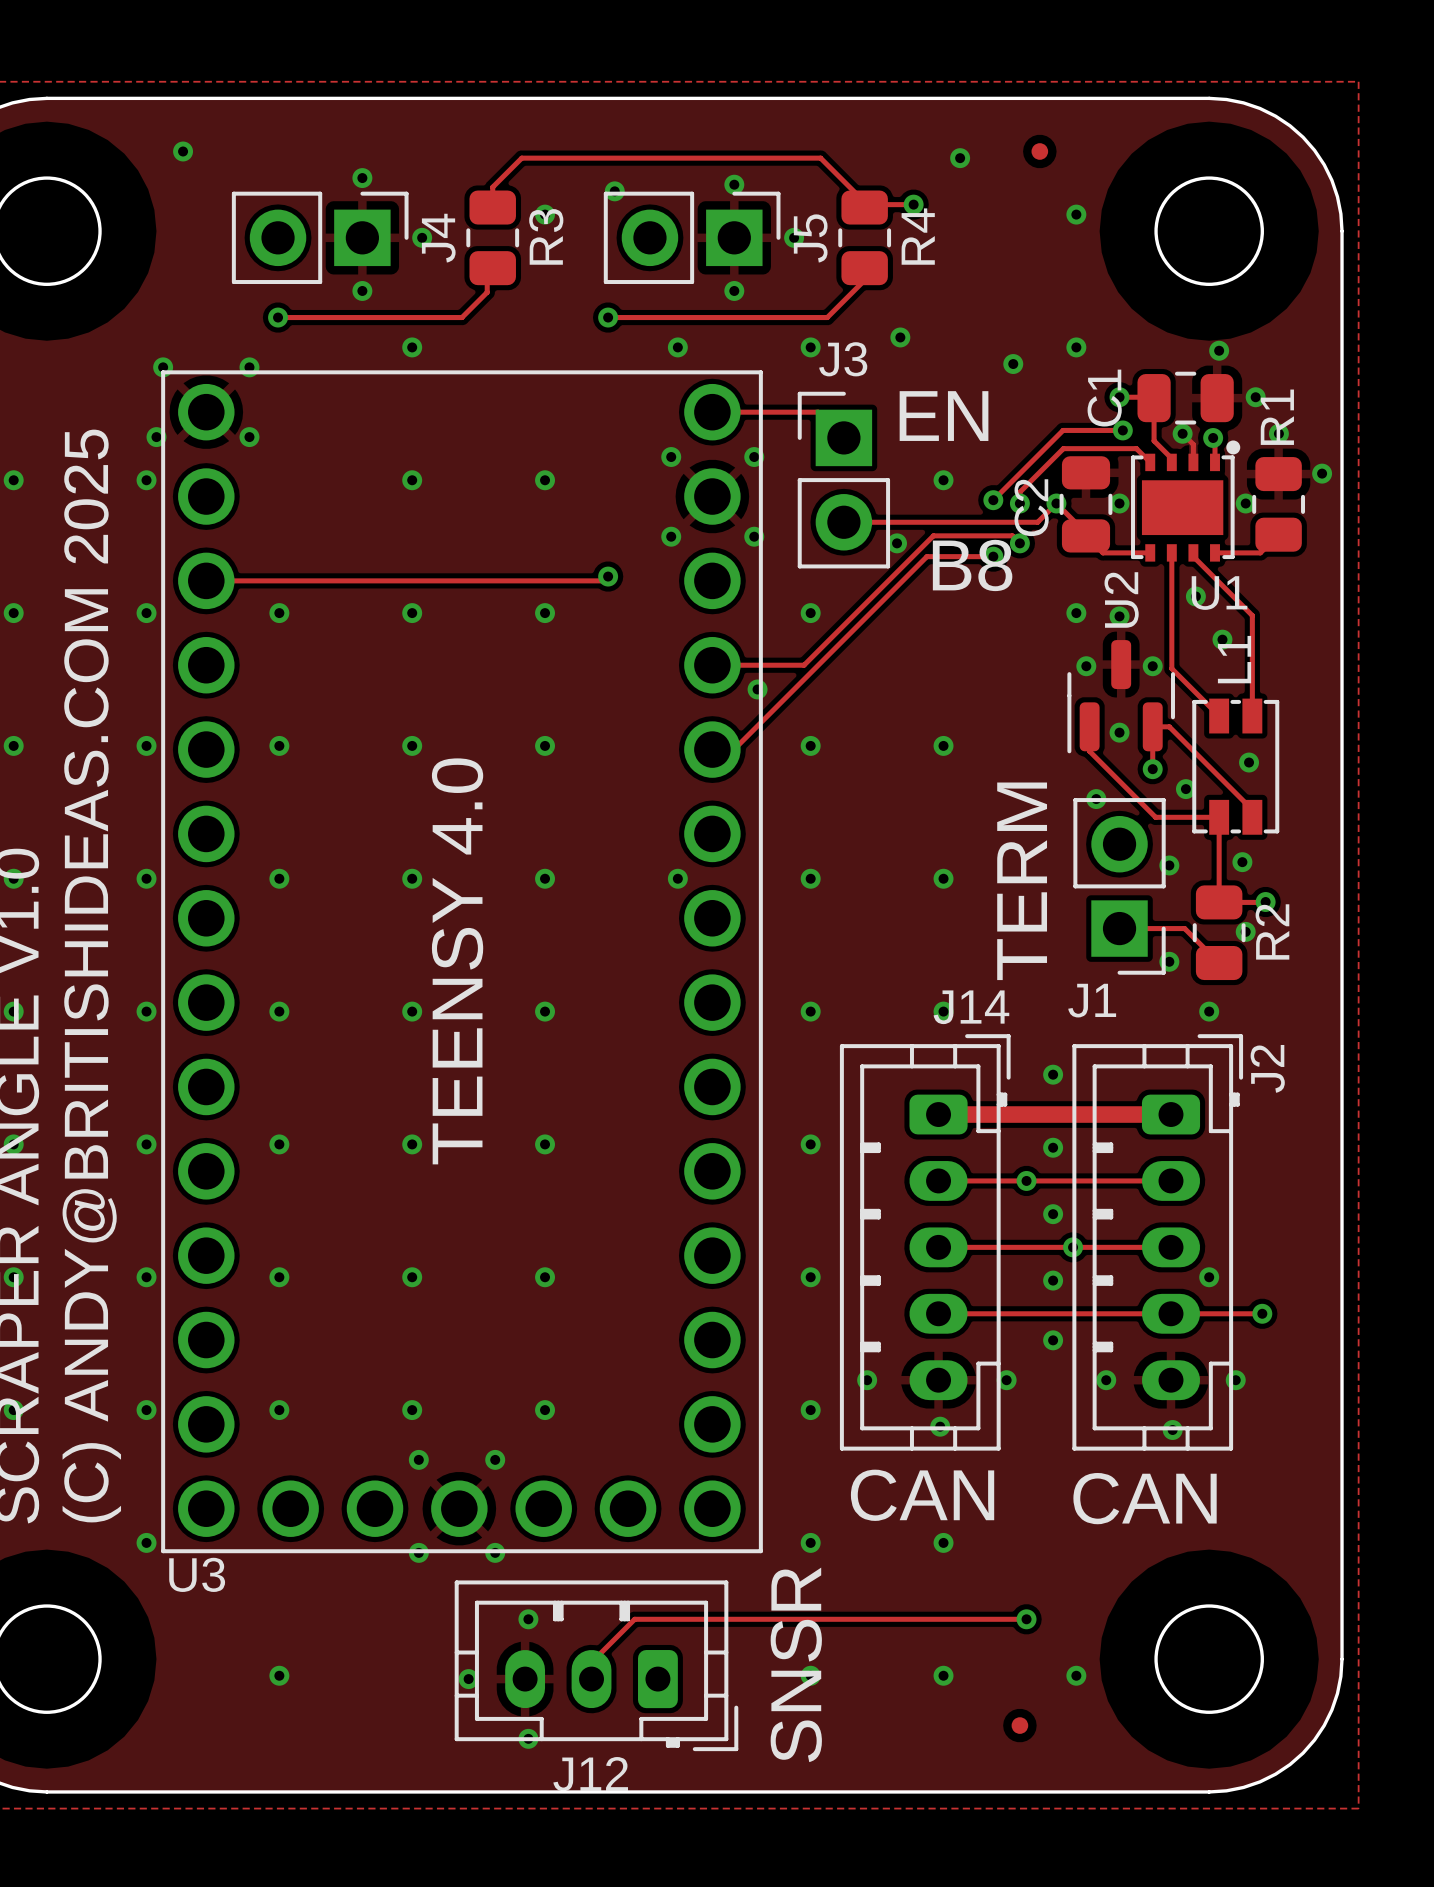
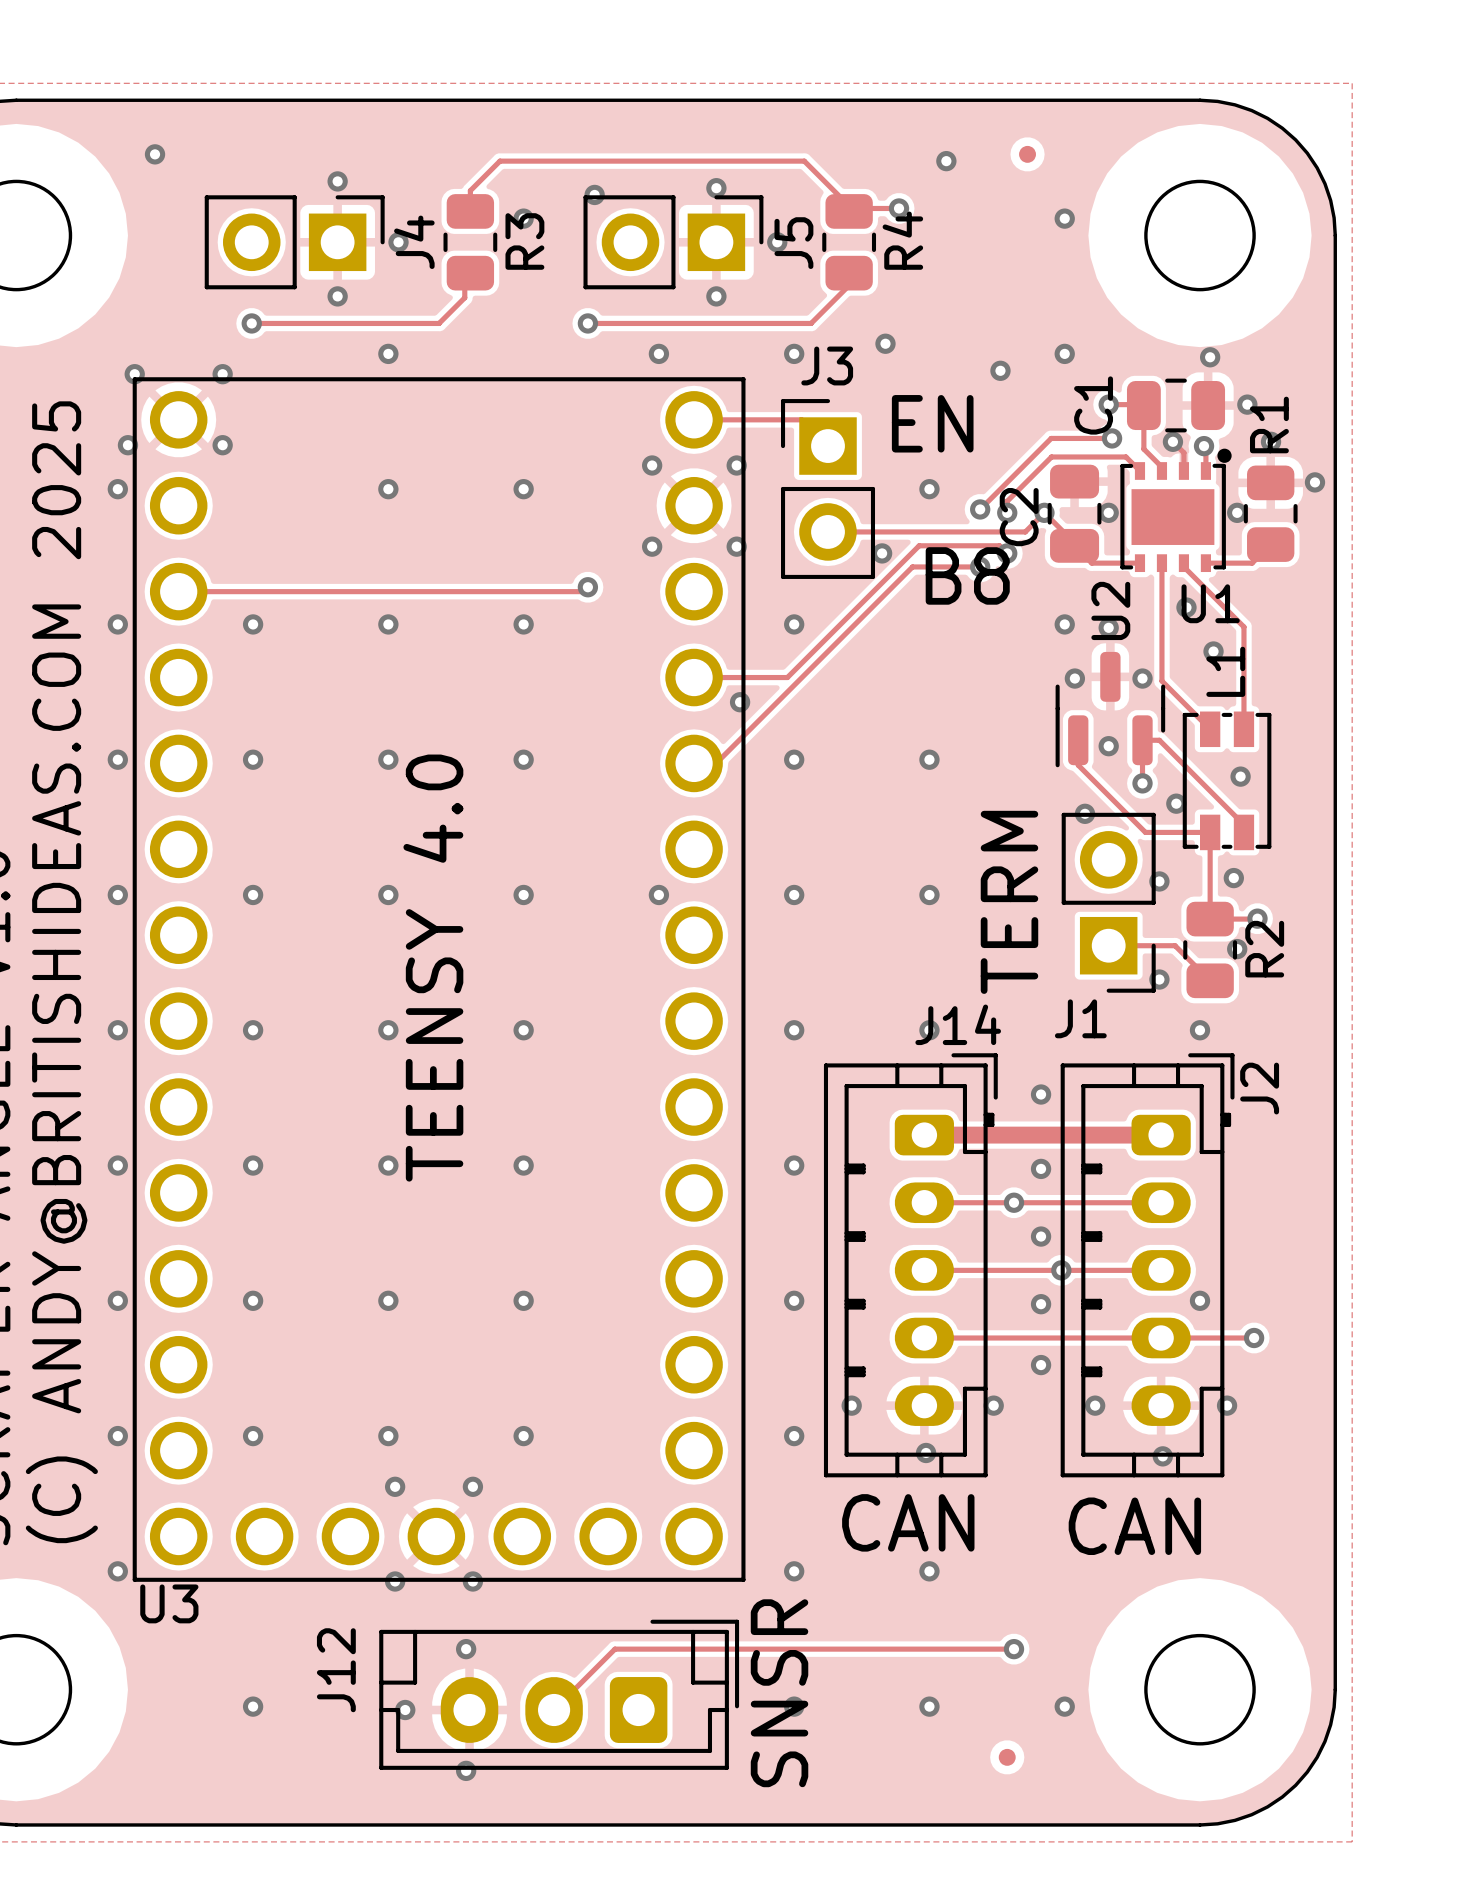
J12 footprint: [454, 1580, 739, 1752] -> [379, 1619, 740, 1770]
via: none -> (466, 1649)
via: (528, 1619) -> none
via: none -> (405, 1710)
via: (468, 1679) -> none
via: none -> (466, 1770)
via: (528, 1738) -> none
J12 name position: J12 (590, 1774) -> J12 (336, 1670)

